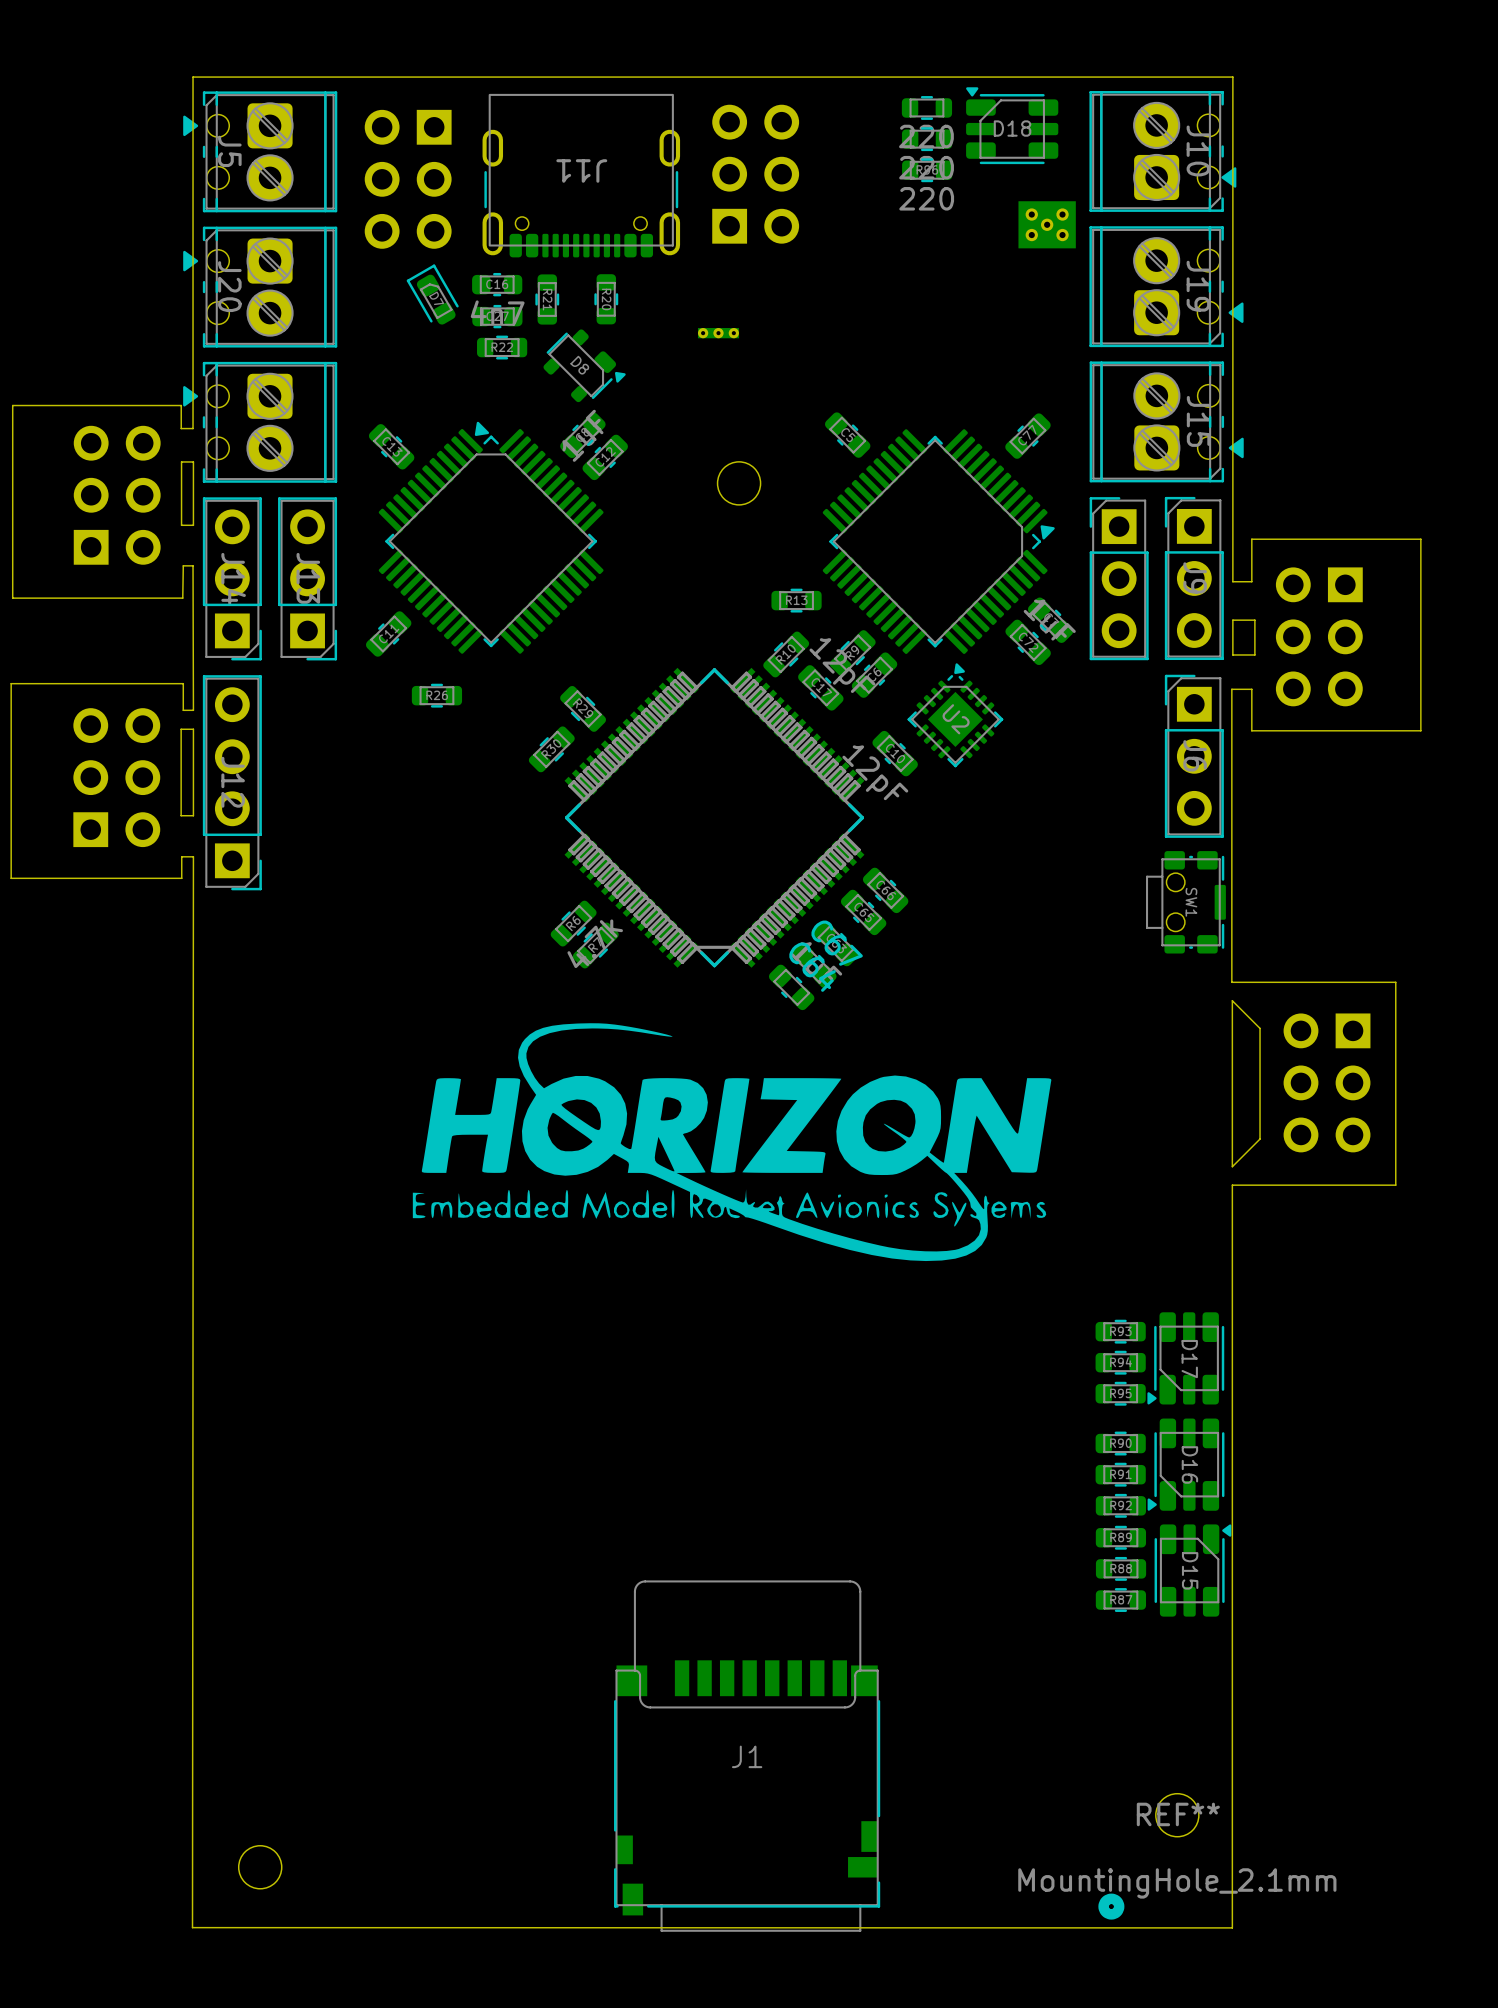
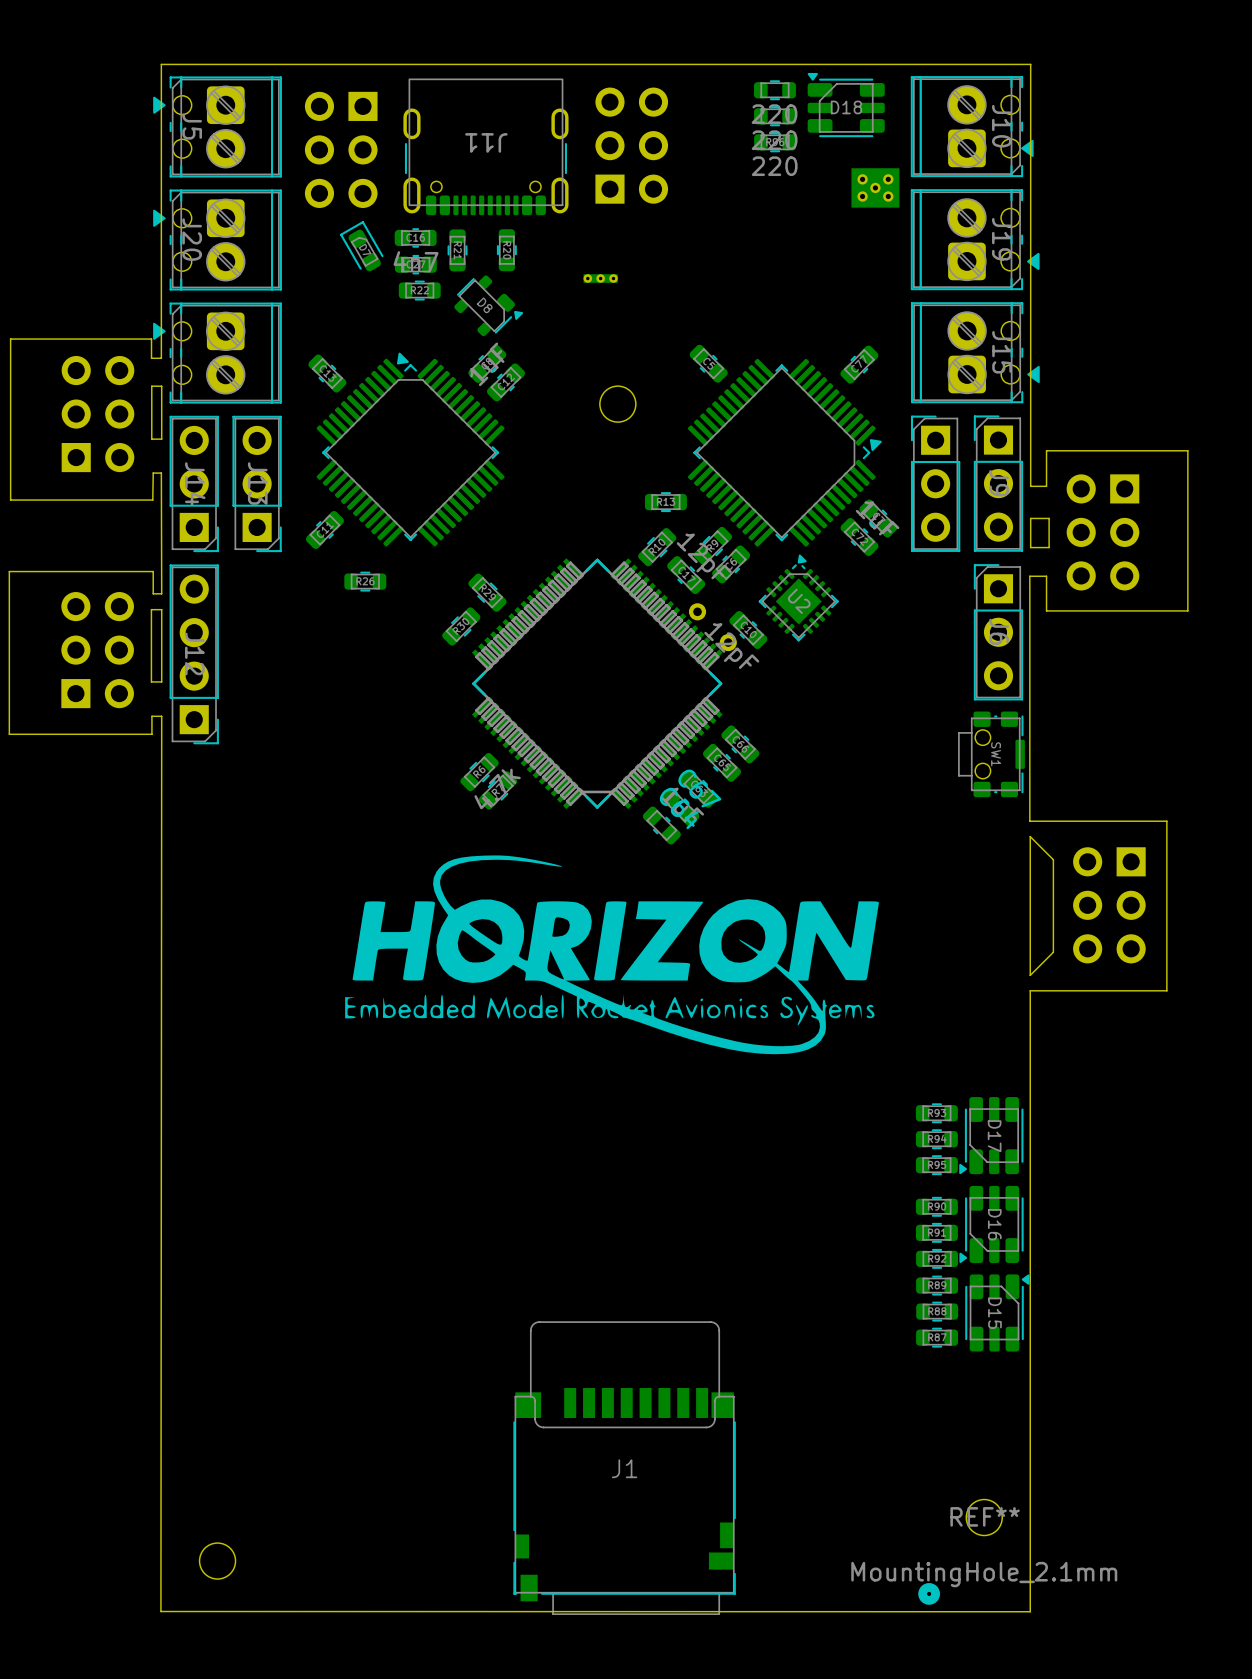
part: none -> (712, 627)

